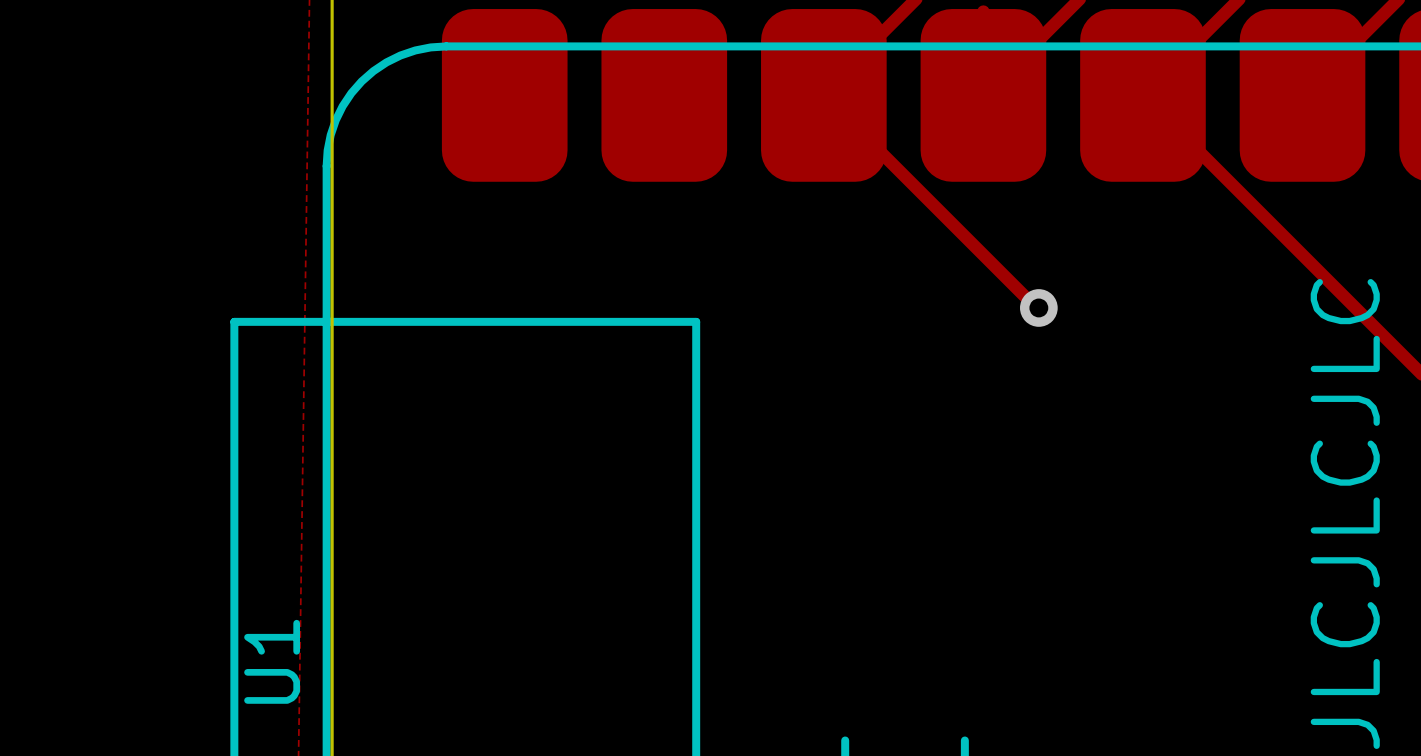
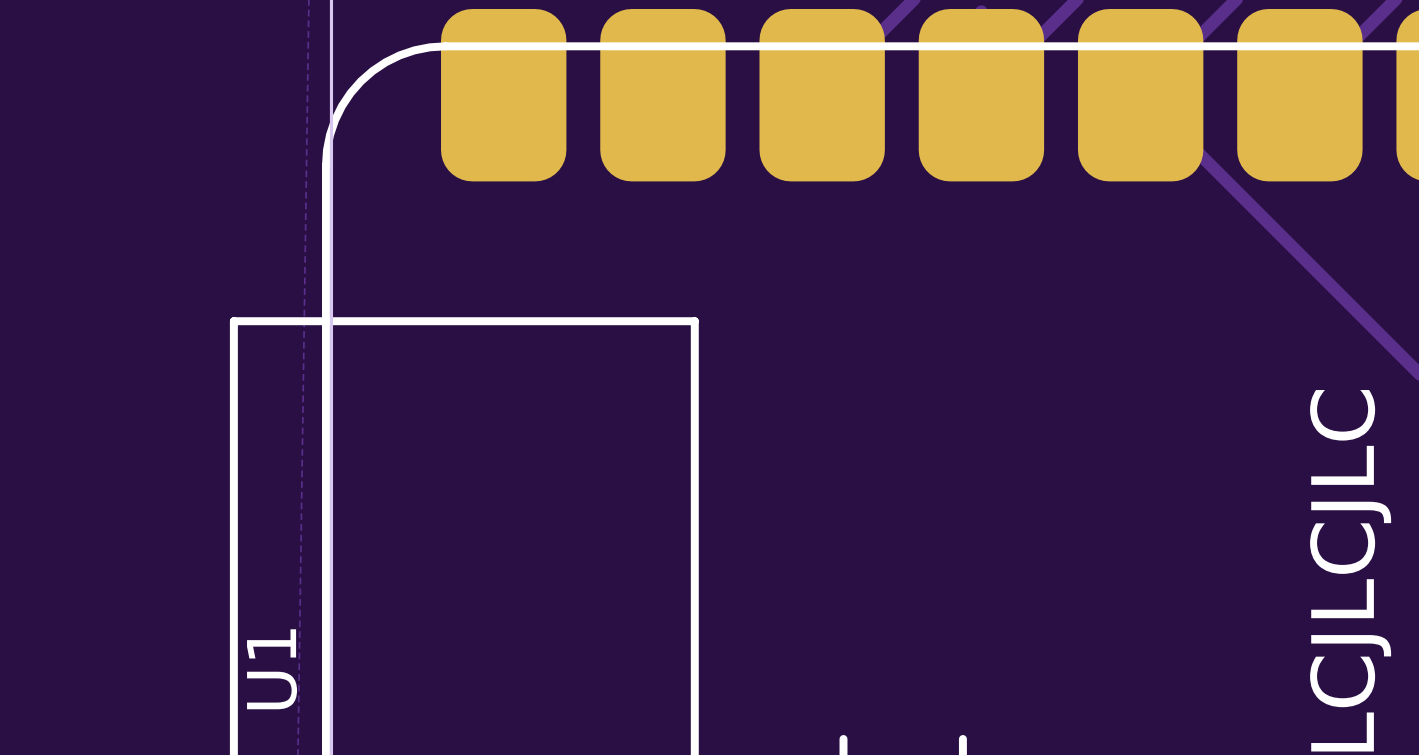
track: (823, 95) (1036, 307) (1038, 307) -> none
via: (1038, 307) -> none

